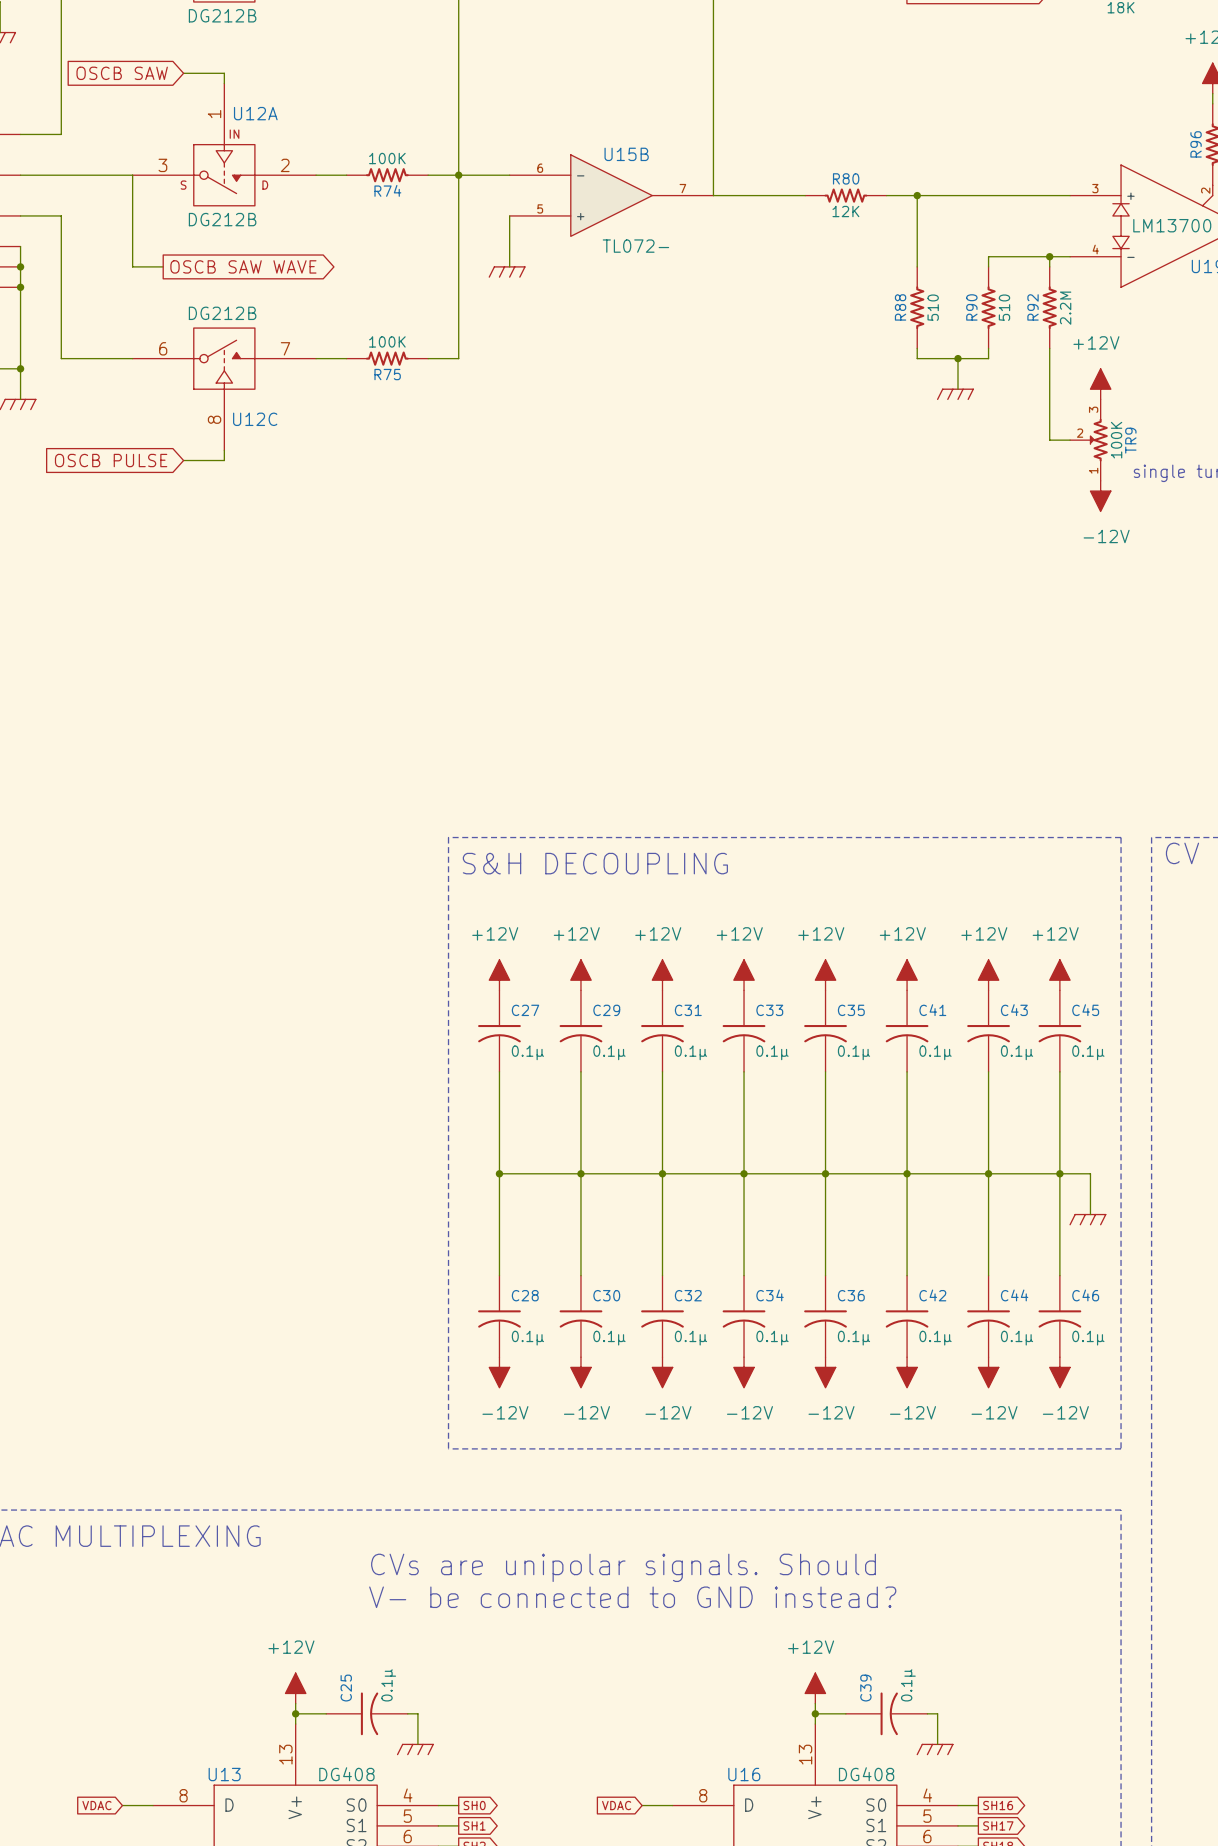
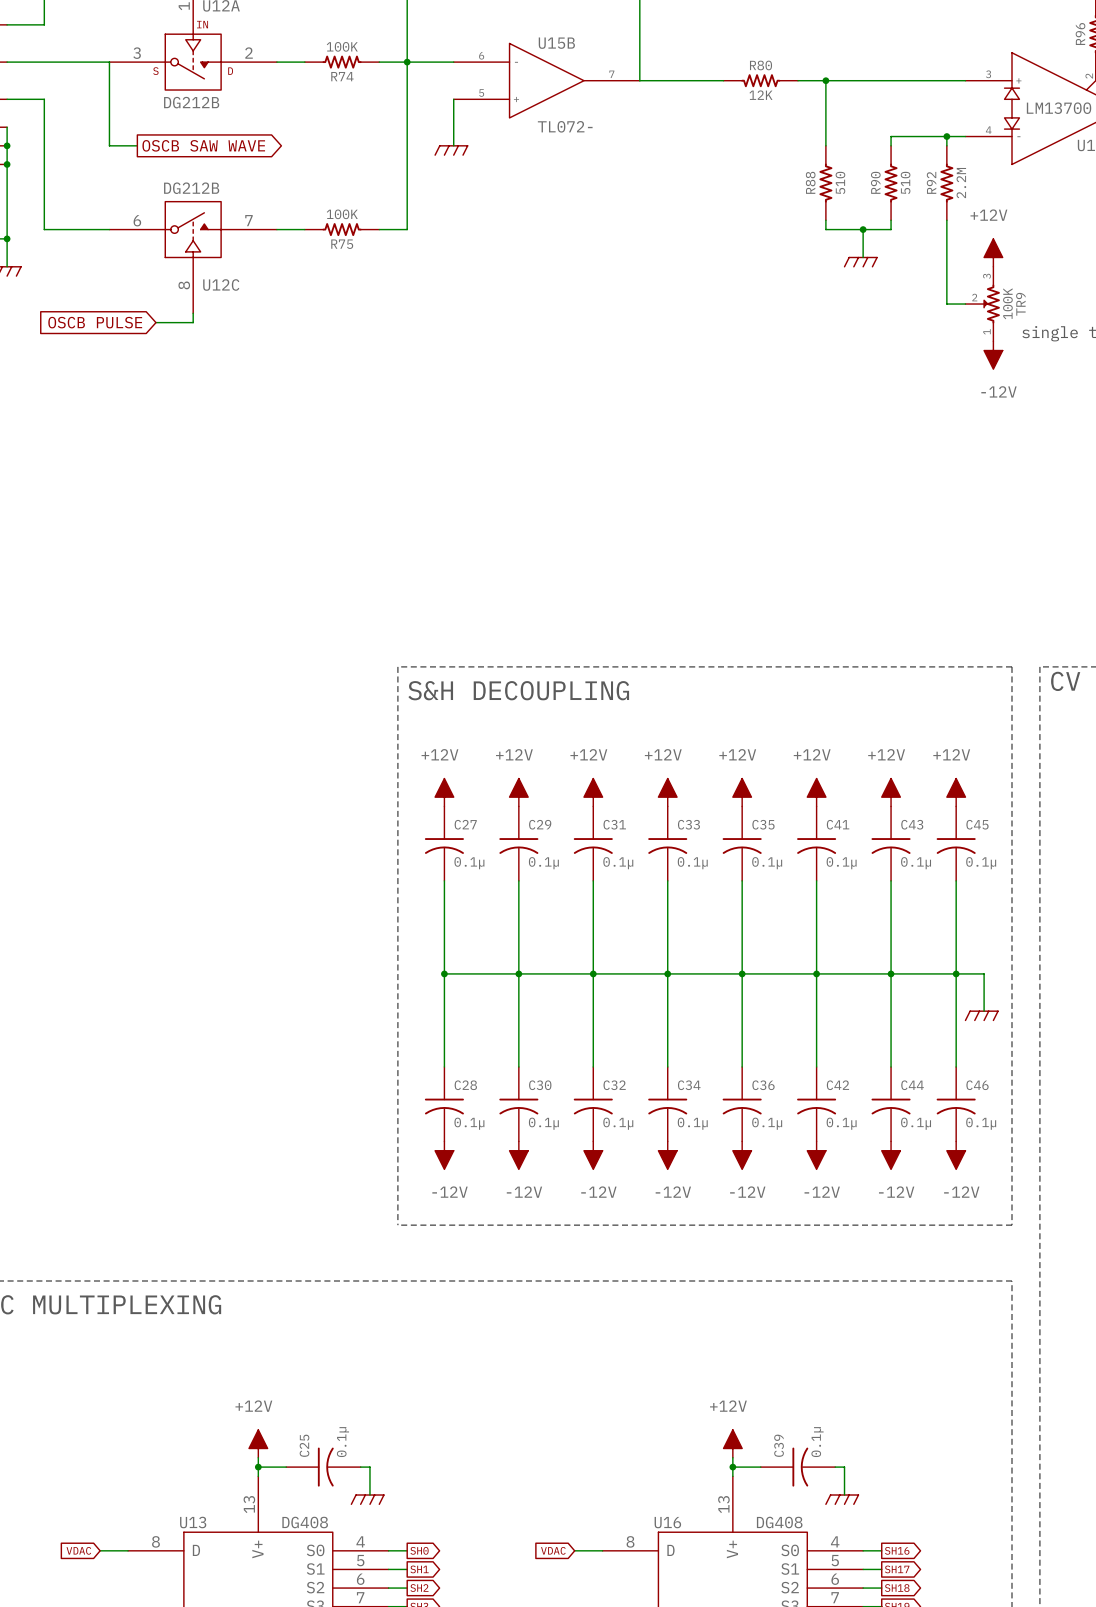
text: CVs are unipolar signals. Should (623, 1567) -> none
text: V- be connected to GND instead? (632, 1597) -> none

